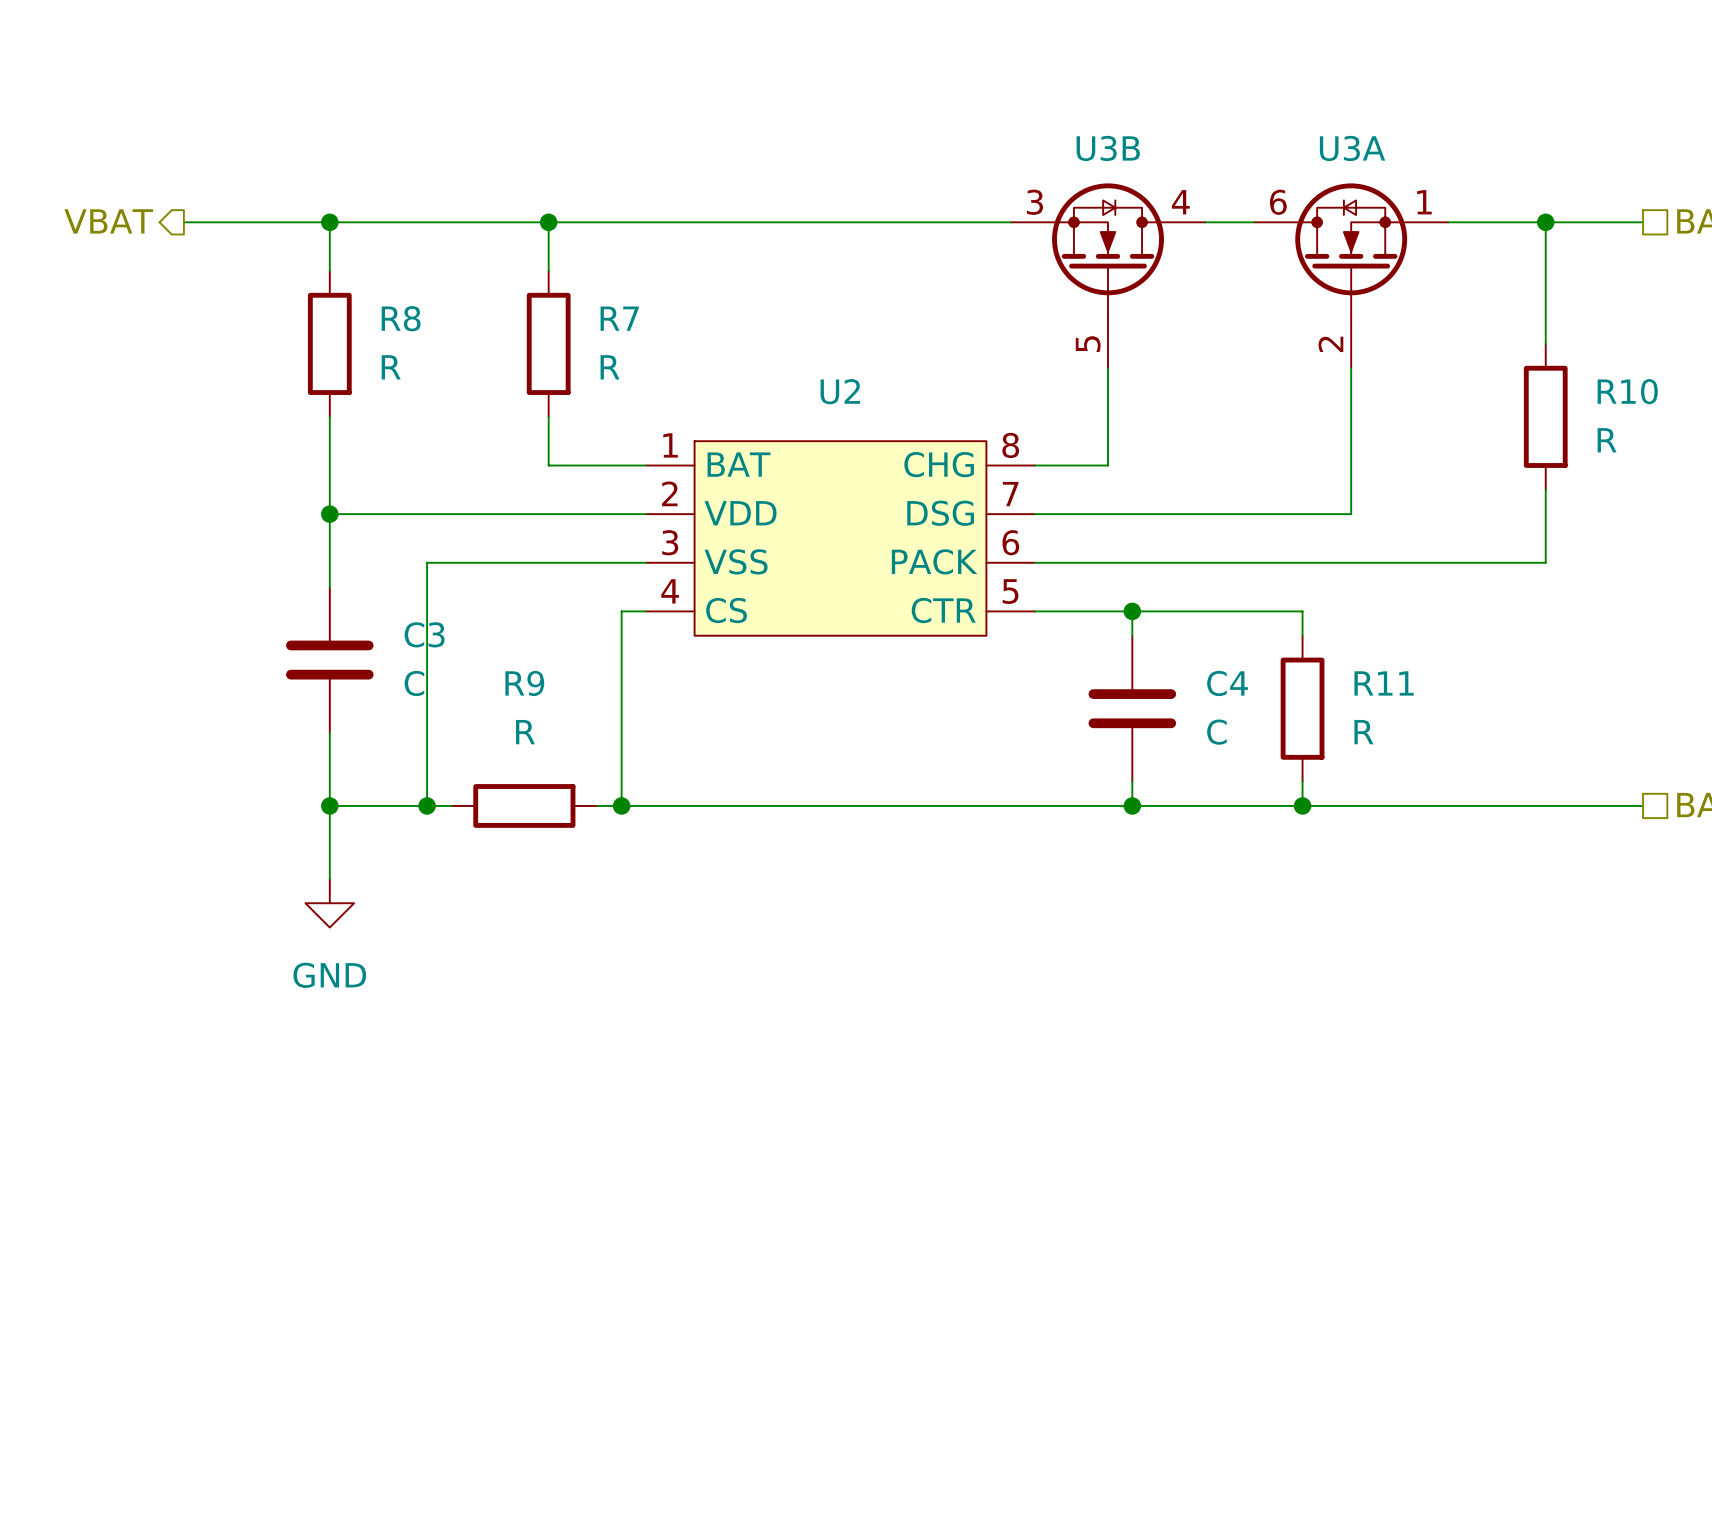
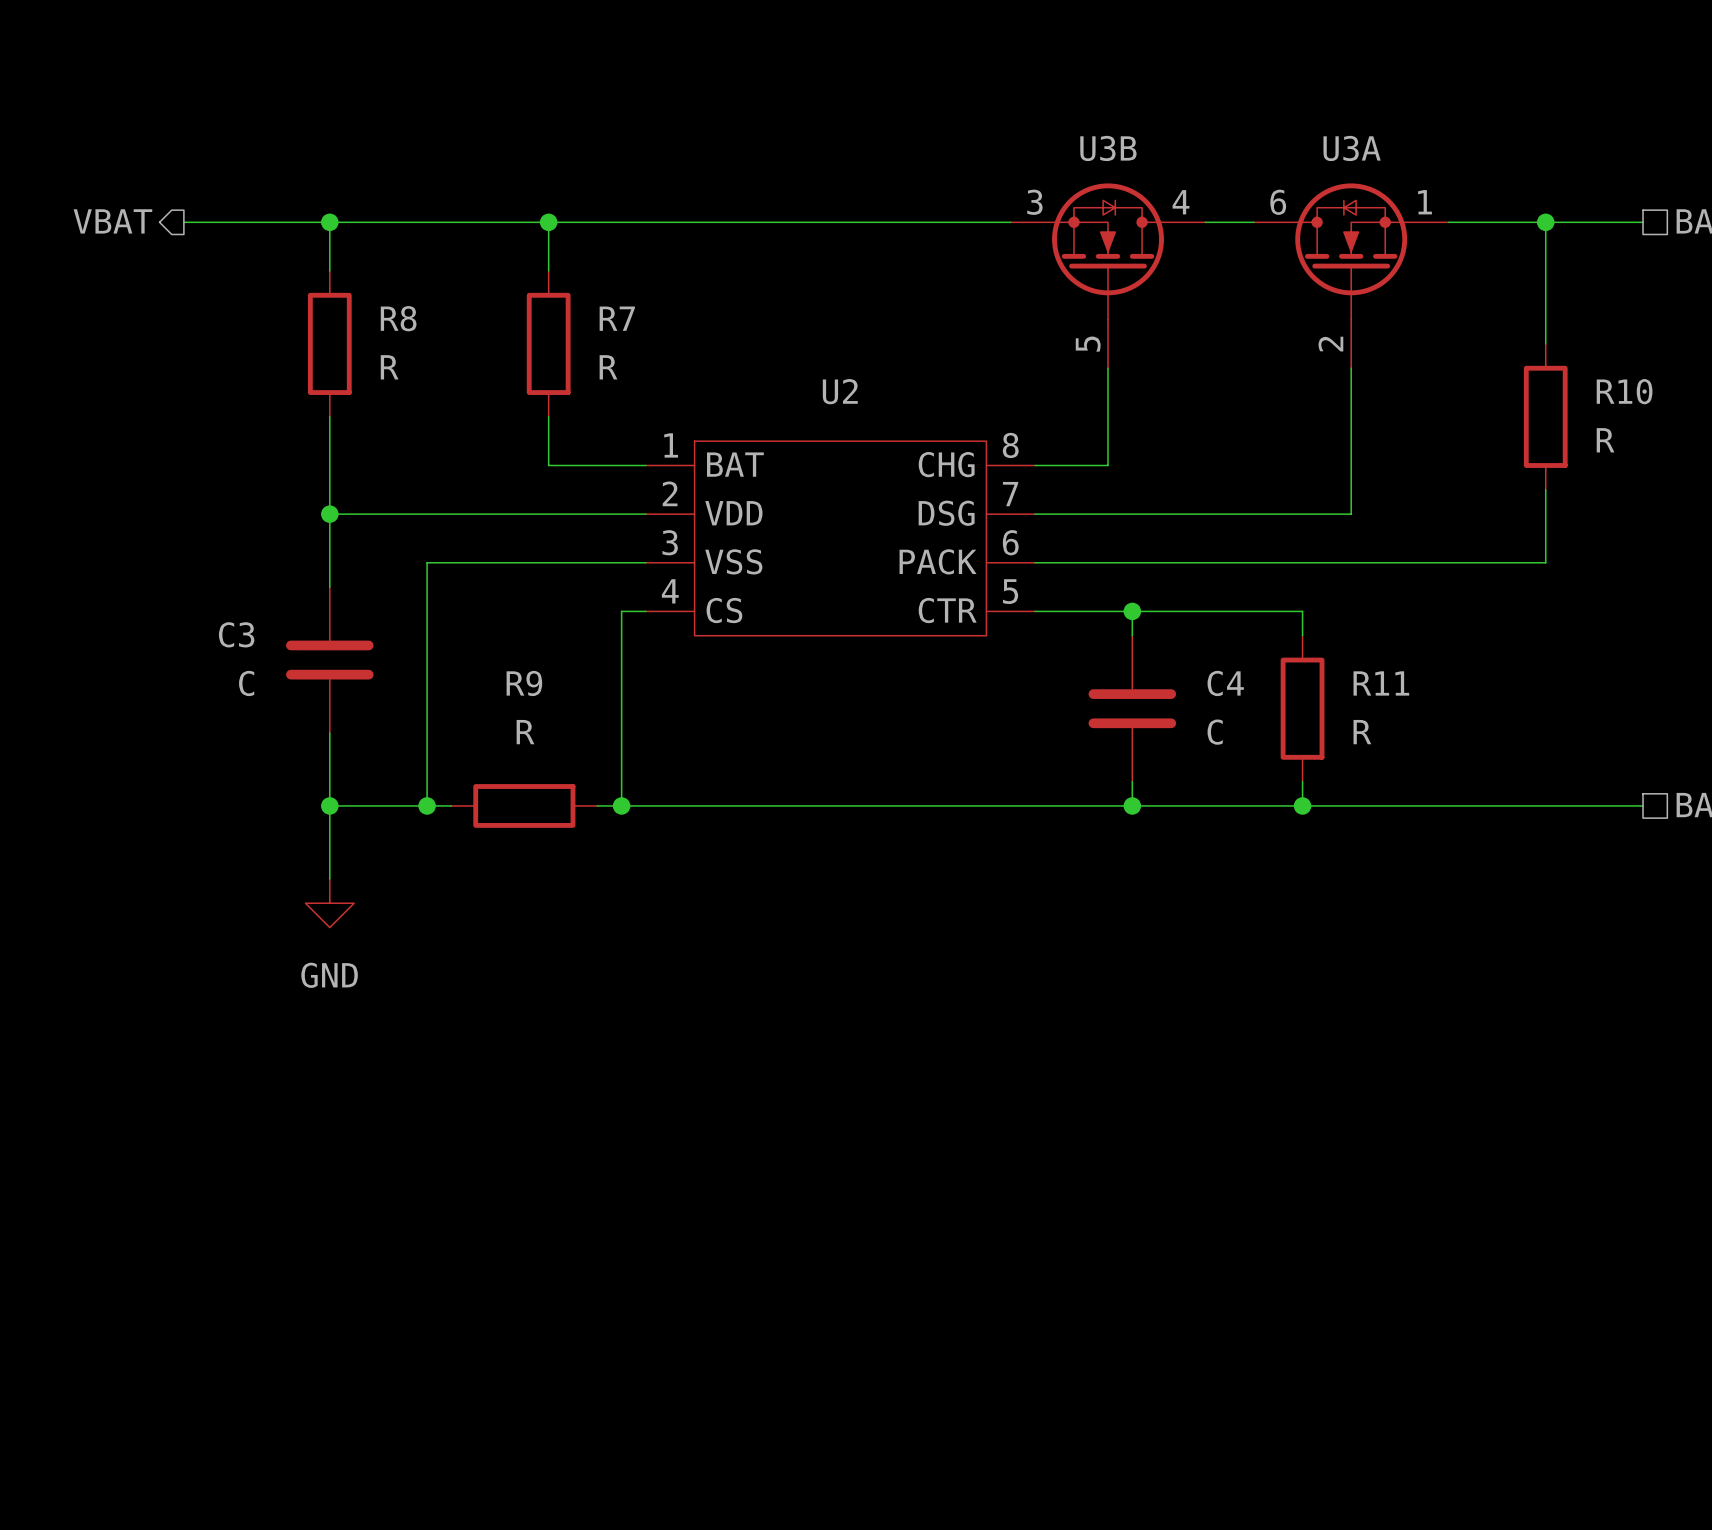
C3 name position: C3 (424, 634) -> C3 (236, 634)
C3 value position: C (414, 683) -> C (246, 683)

